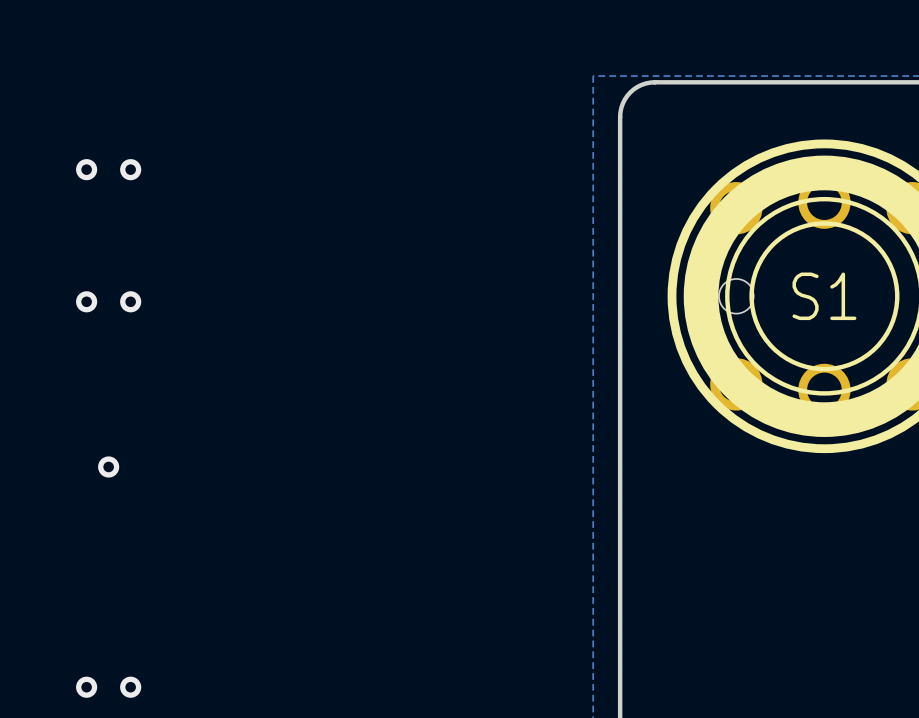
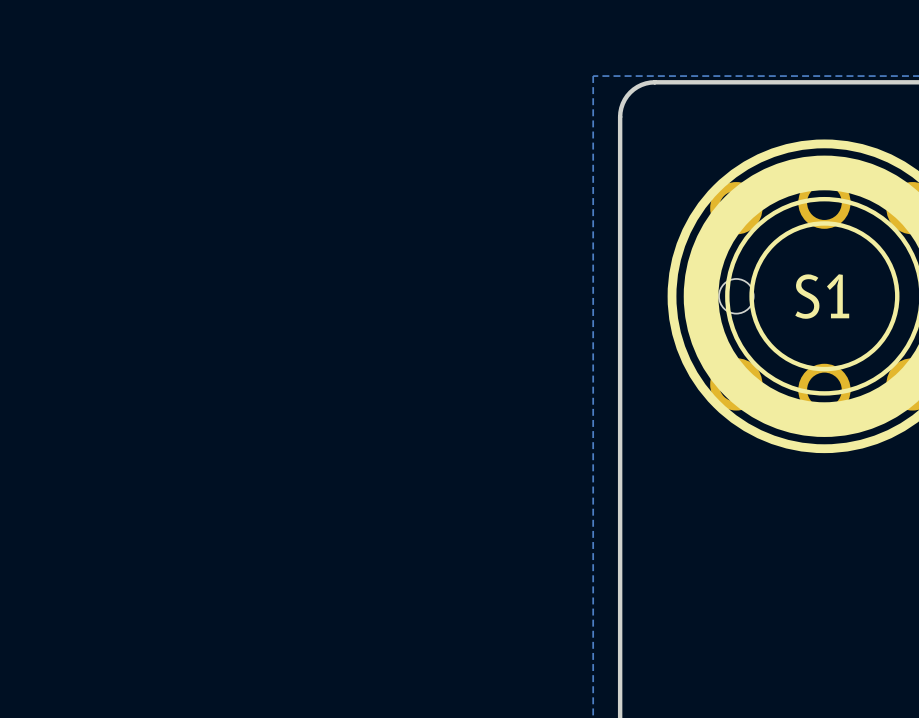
via: (86, 169) -> none
via: (130, 169) -> none
via: (86, 301) -> none
via: (130, 301) -> none
via: (108, 466) -> none
via: (86, 687) -> none
via: (130, 687) -> none

